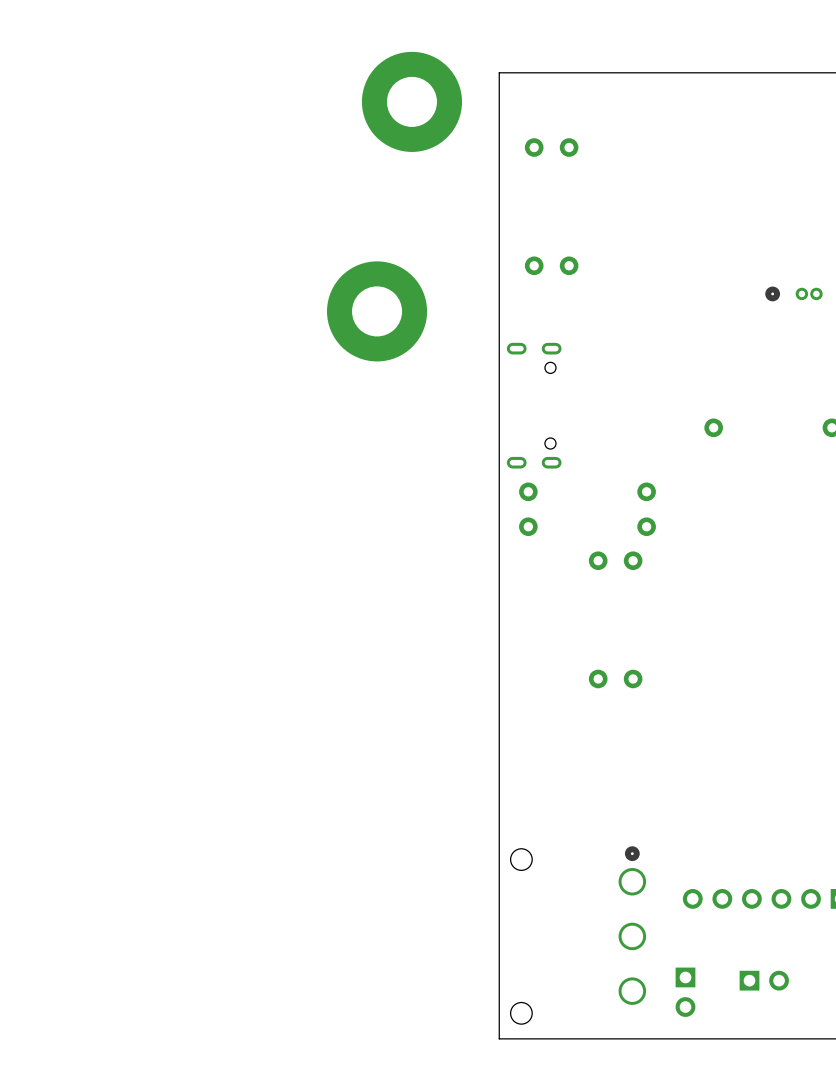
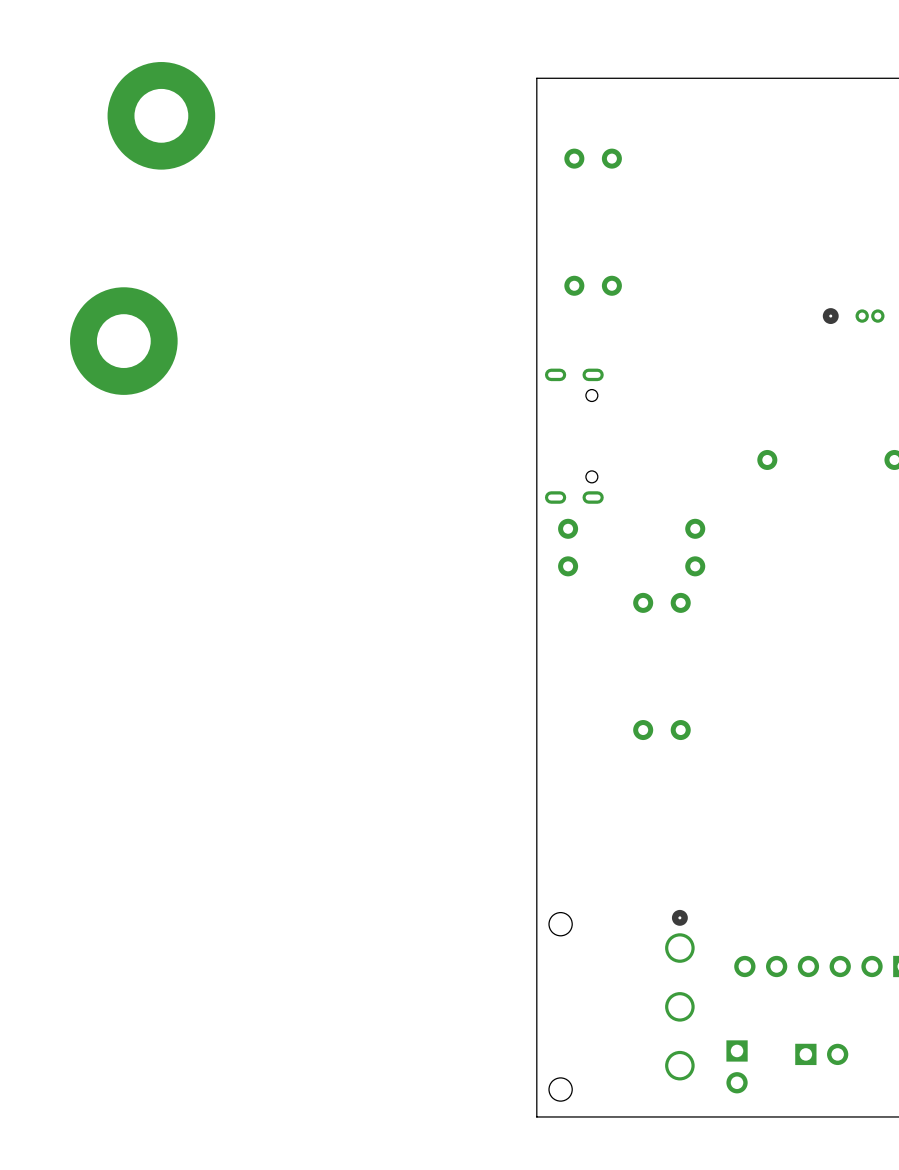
part: (411, 101) -> none
part: none -> (161, 115)
part: (377, 311) -> none
part: none -> (123, 341)

